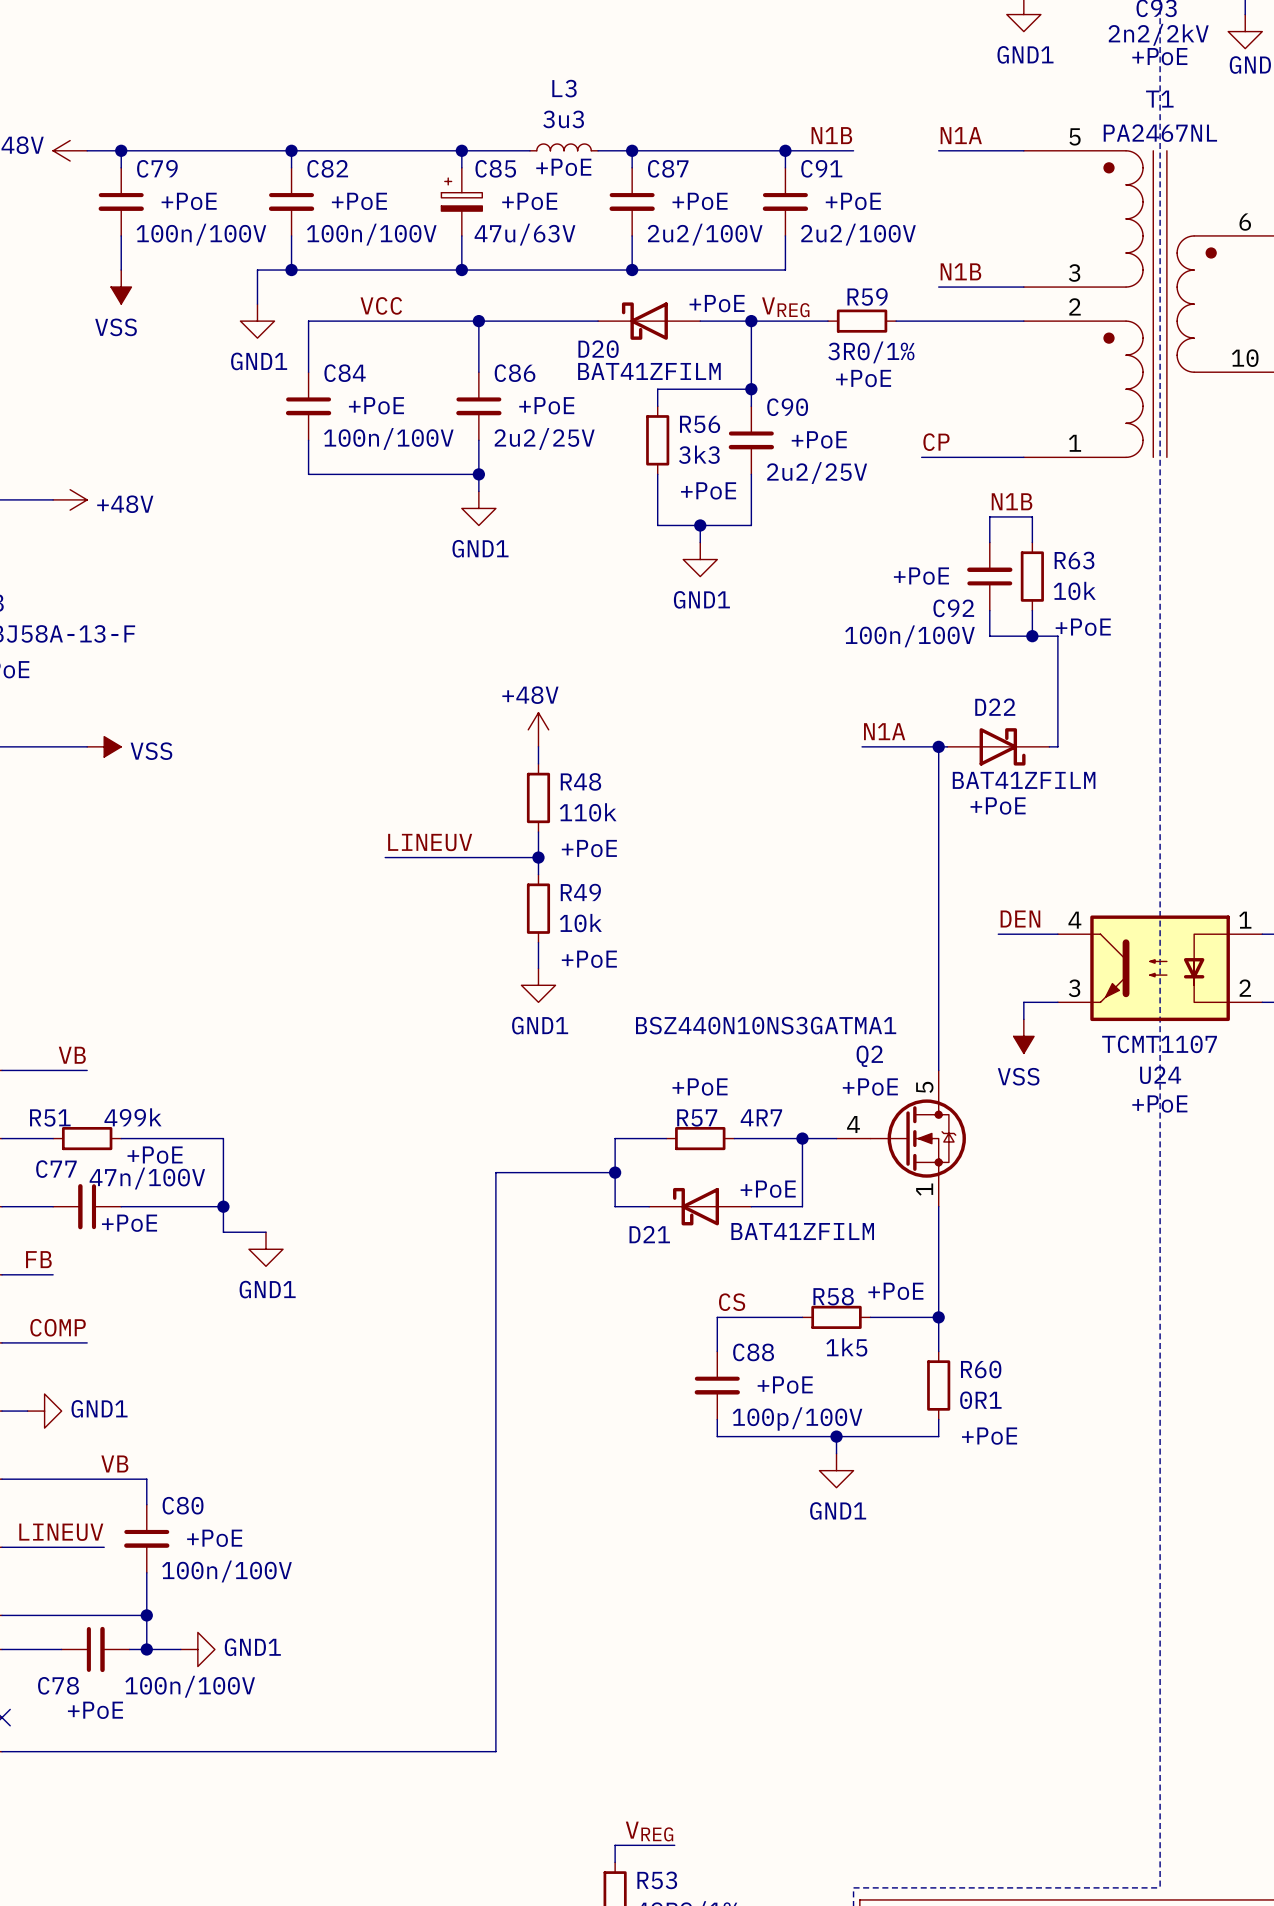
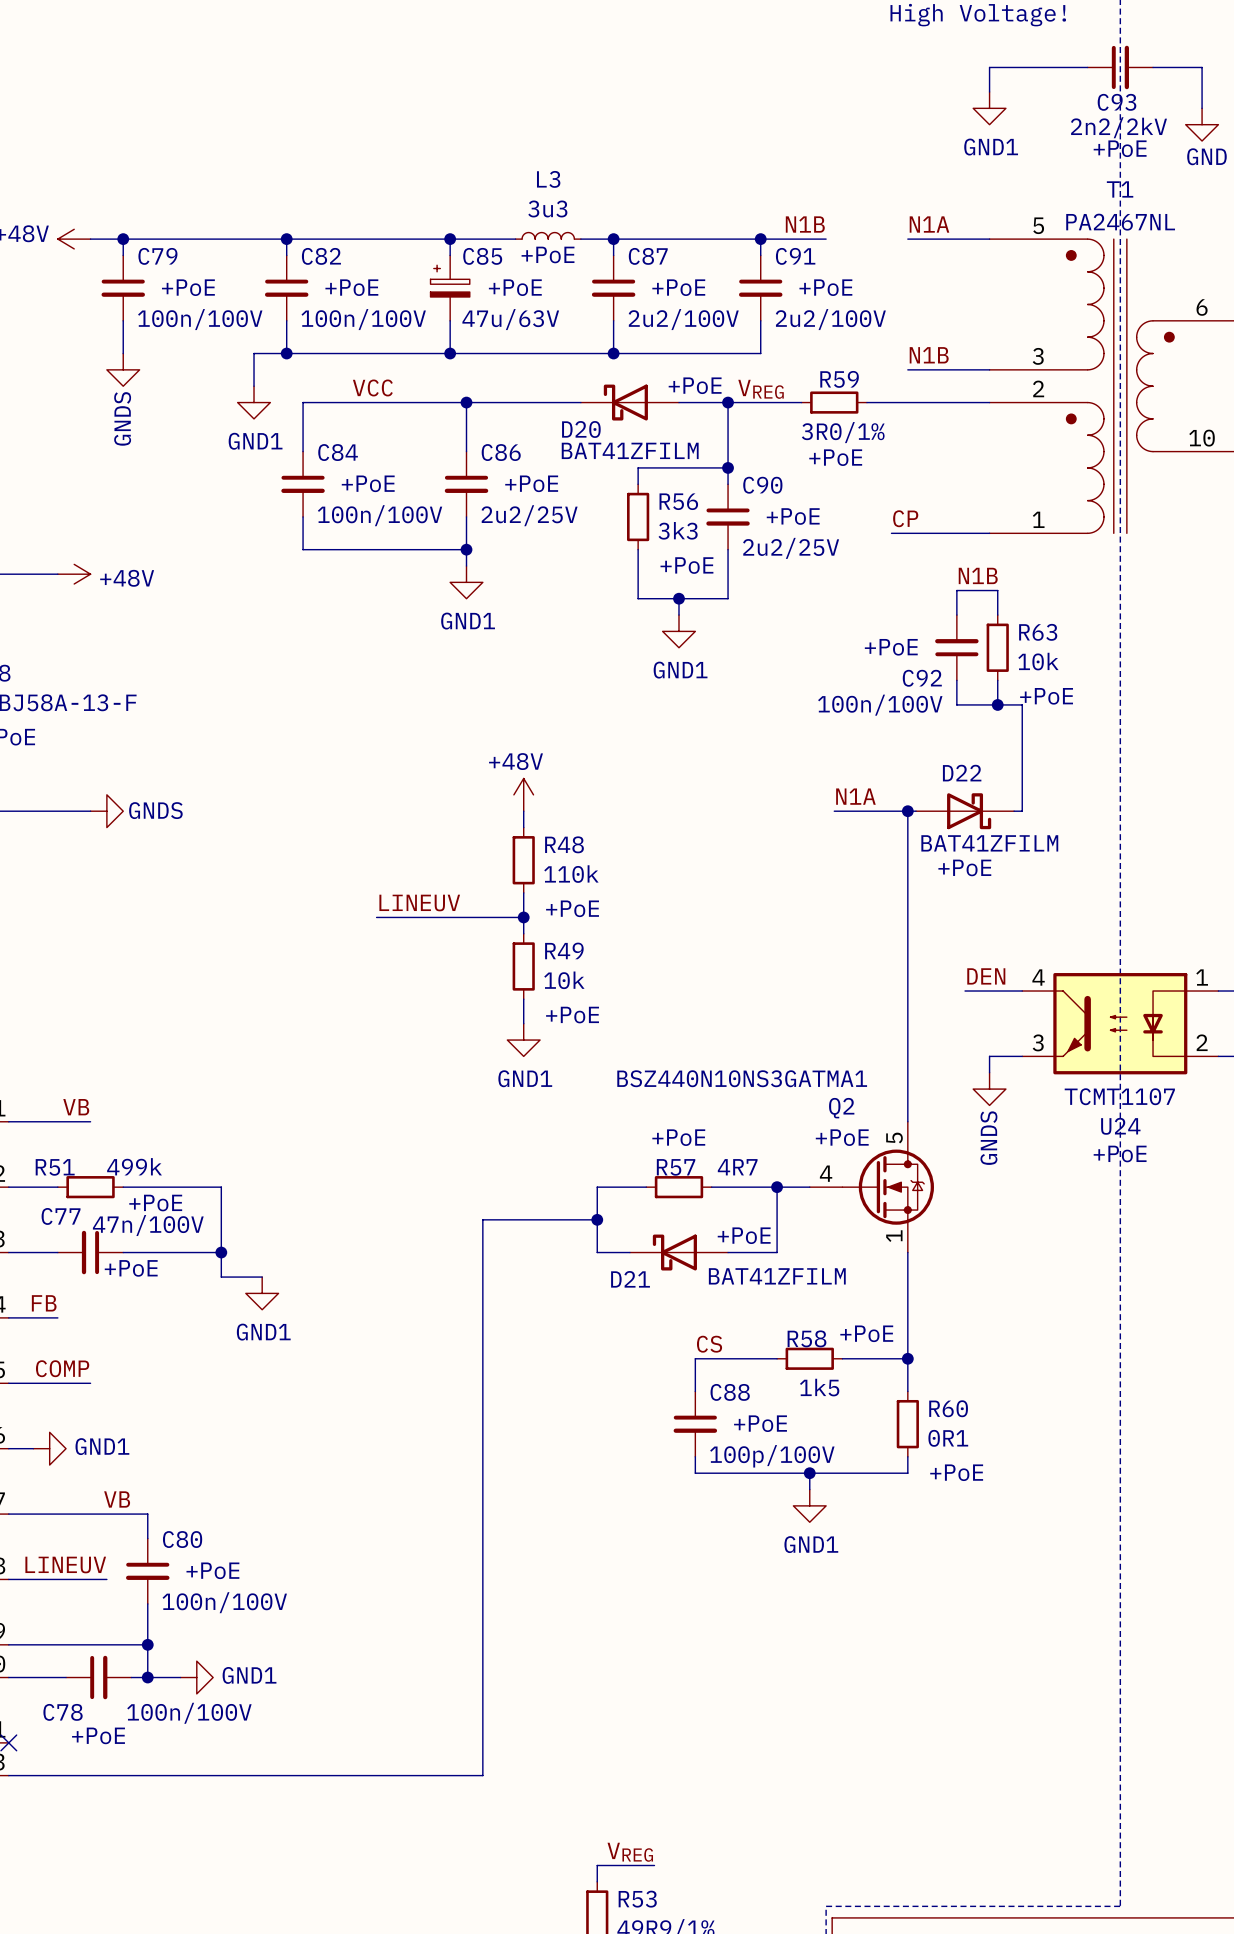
power symbol: VSS (121, 287) -> GNDS (123, 369)
power symbol: VSS (104, 746) -> GNDS (106, 811)
power symbol: VSS (1023, 1036) -> GNDS (989, 1089)

